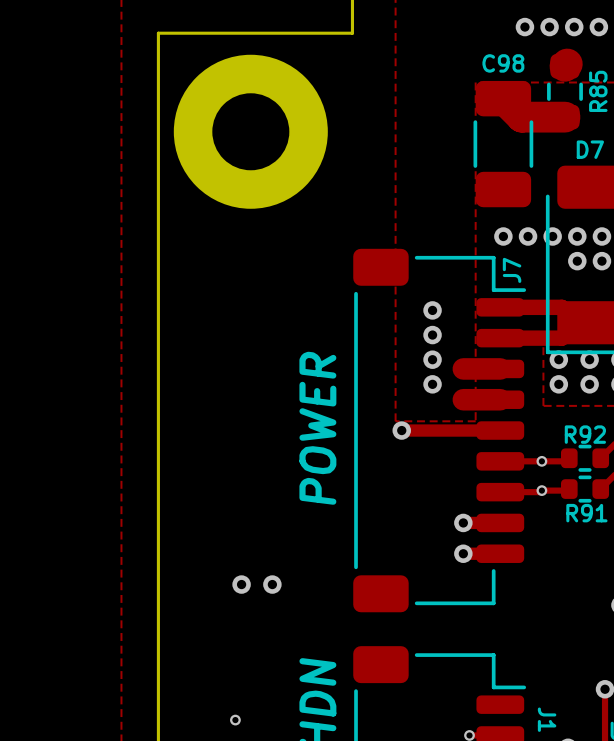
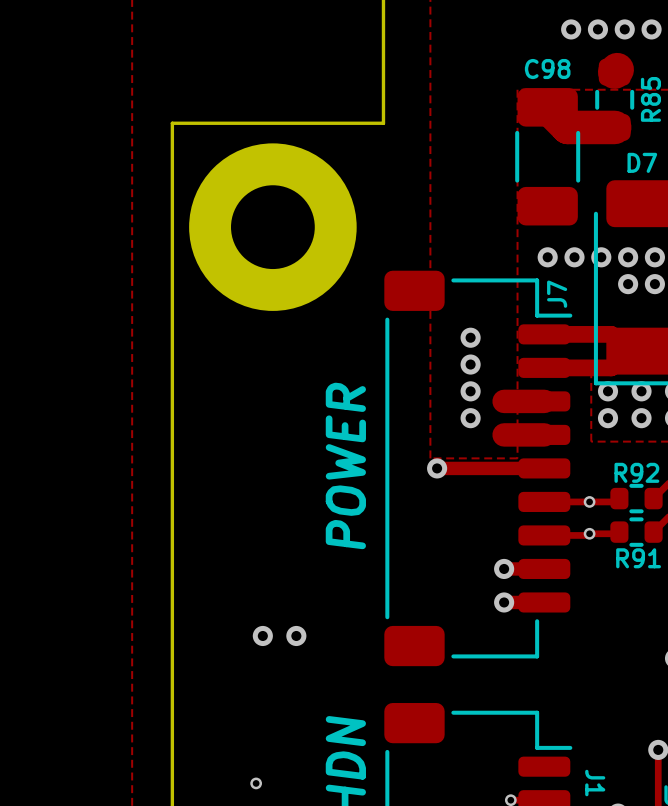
board edge: (352, 33) (158, 33) (158, 113) -> (383, 36) (383, 123) (172, 123)
part position: (250, 131) -> (272, 227)

